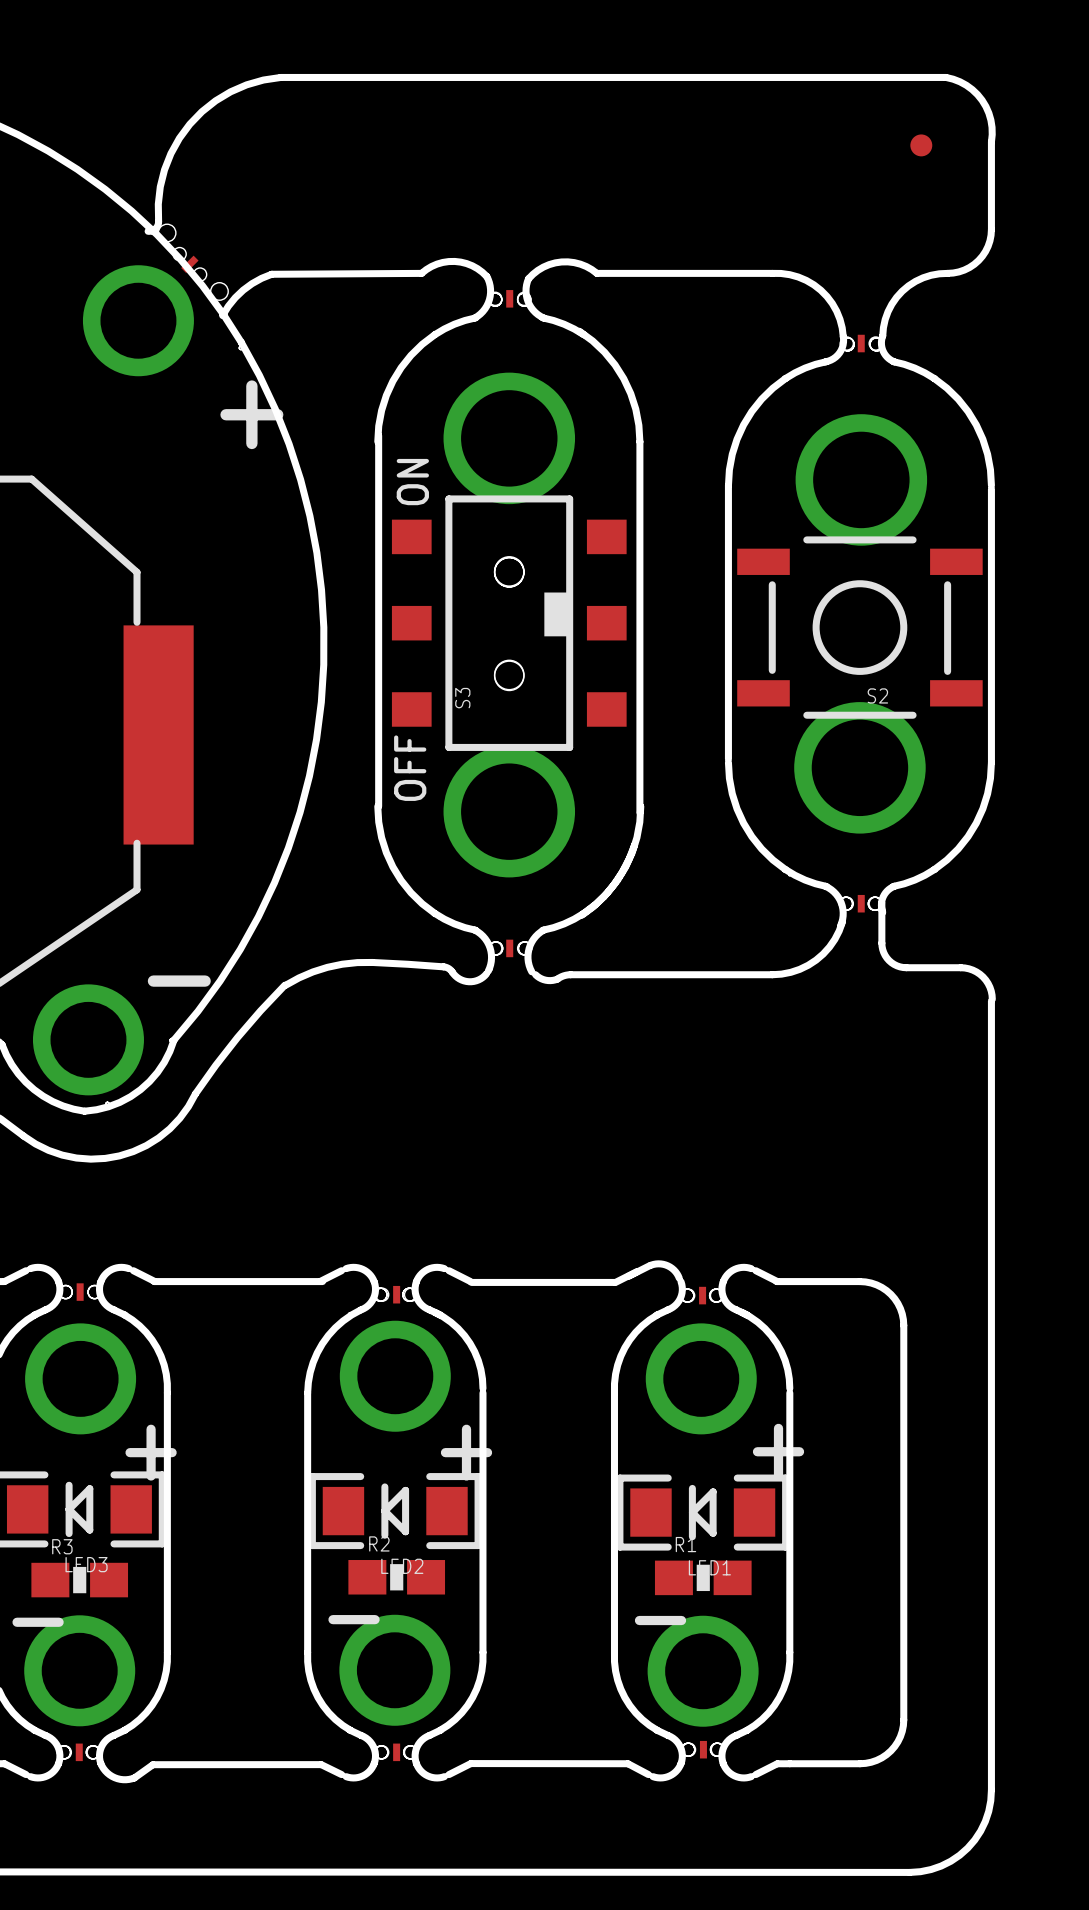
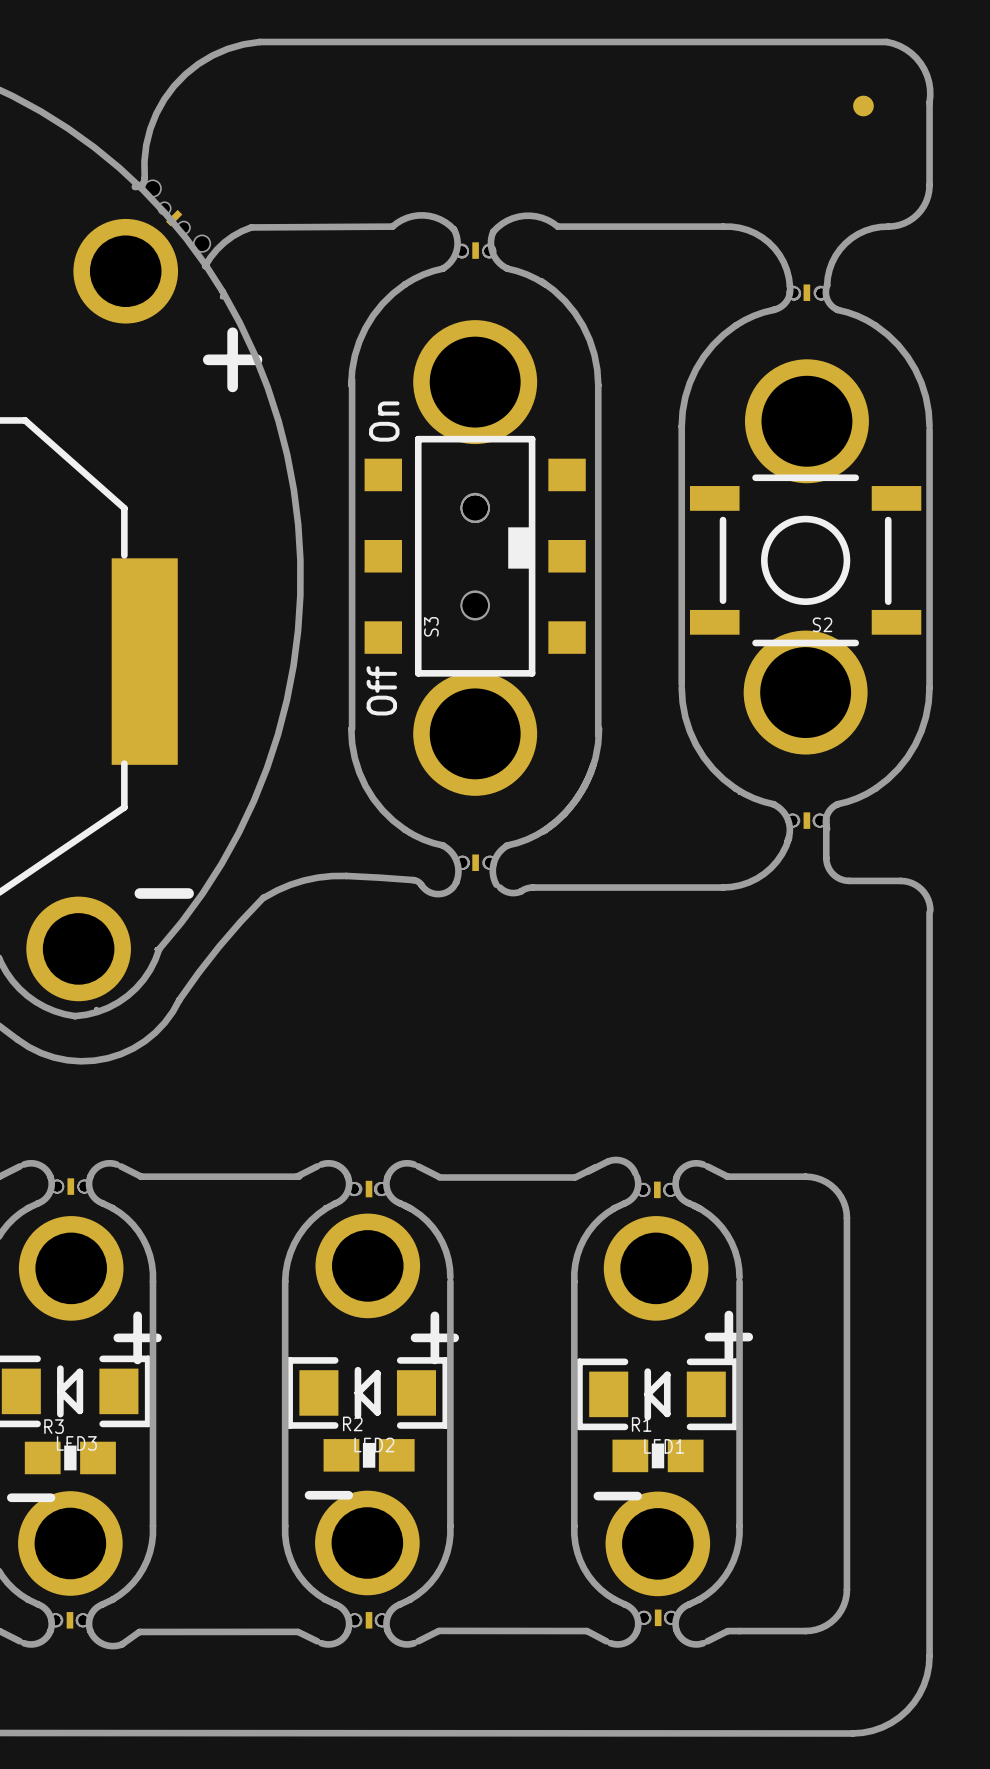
text: ON (412, 482) -> On (384, 421)
text: OFF (410, 768) -> Off (381, 690)

